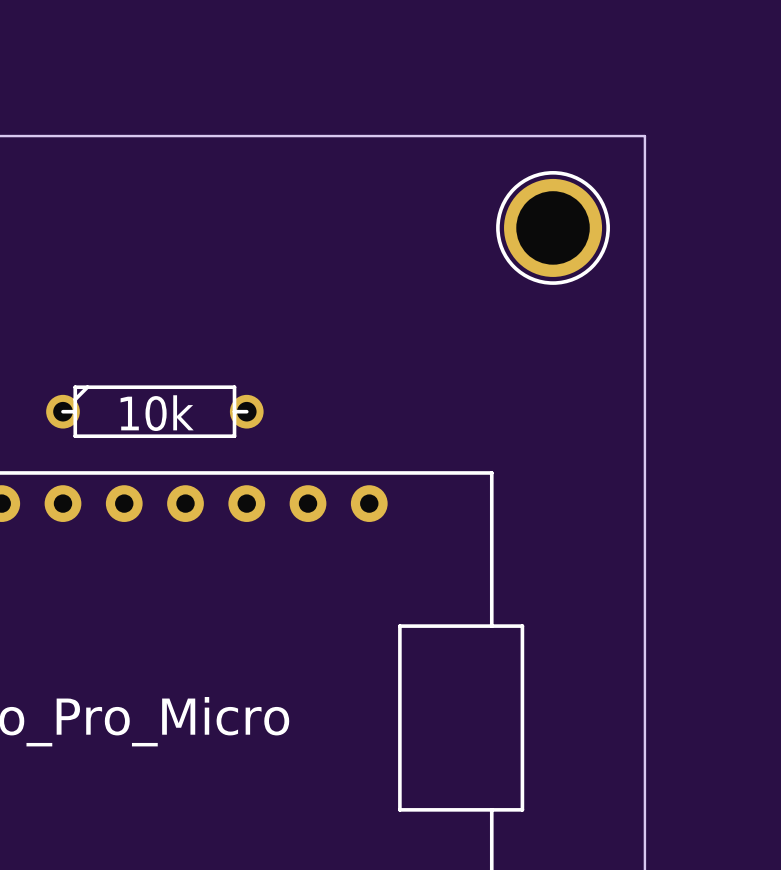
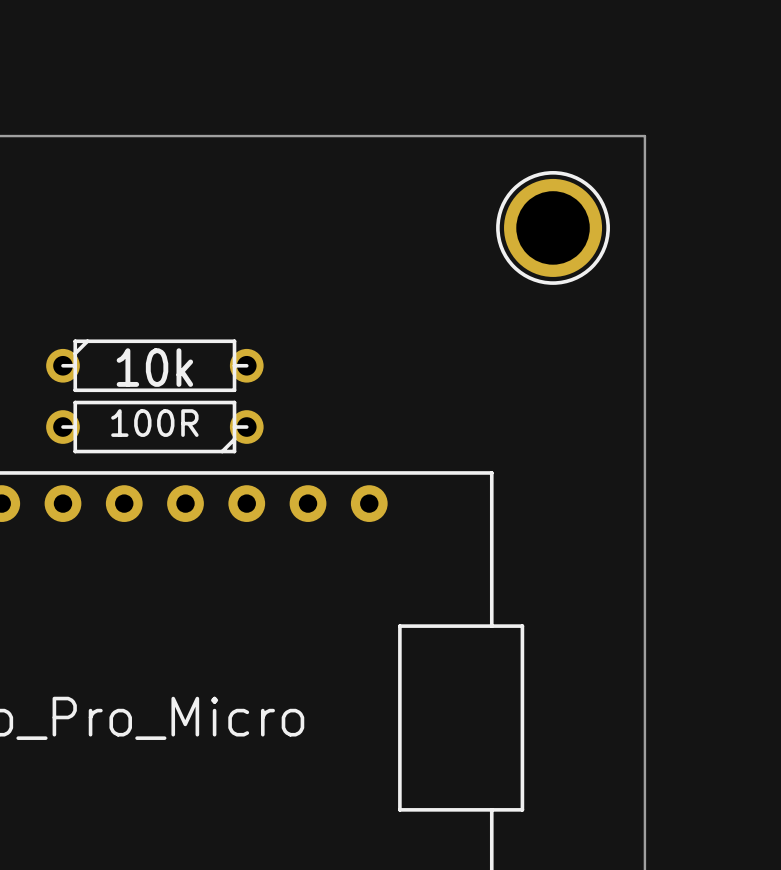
part: none -> 10k (154, 365)
part rotation: 0° (154, 411) -> 180° (154, 427)
part value: 10k (157, 413) -> 100R (154, 423)

